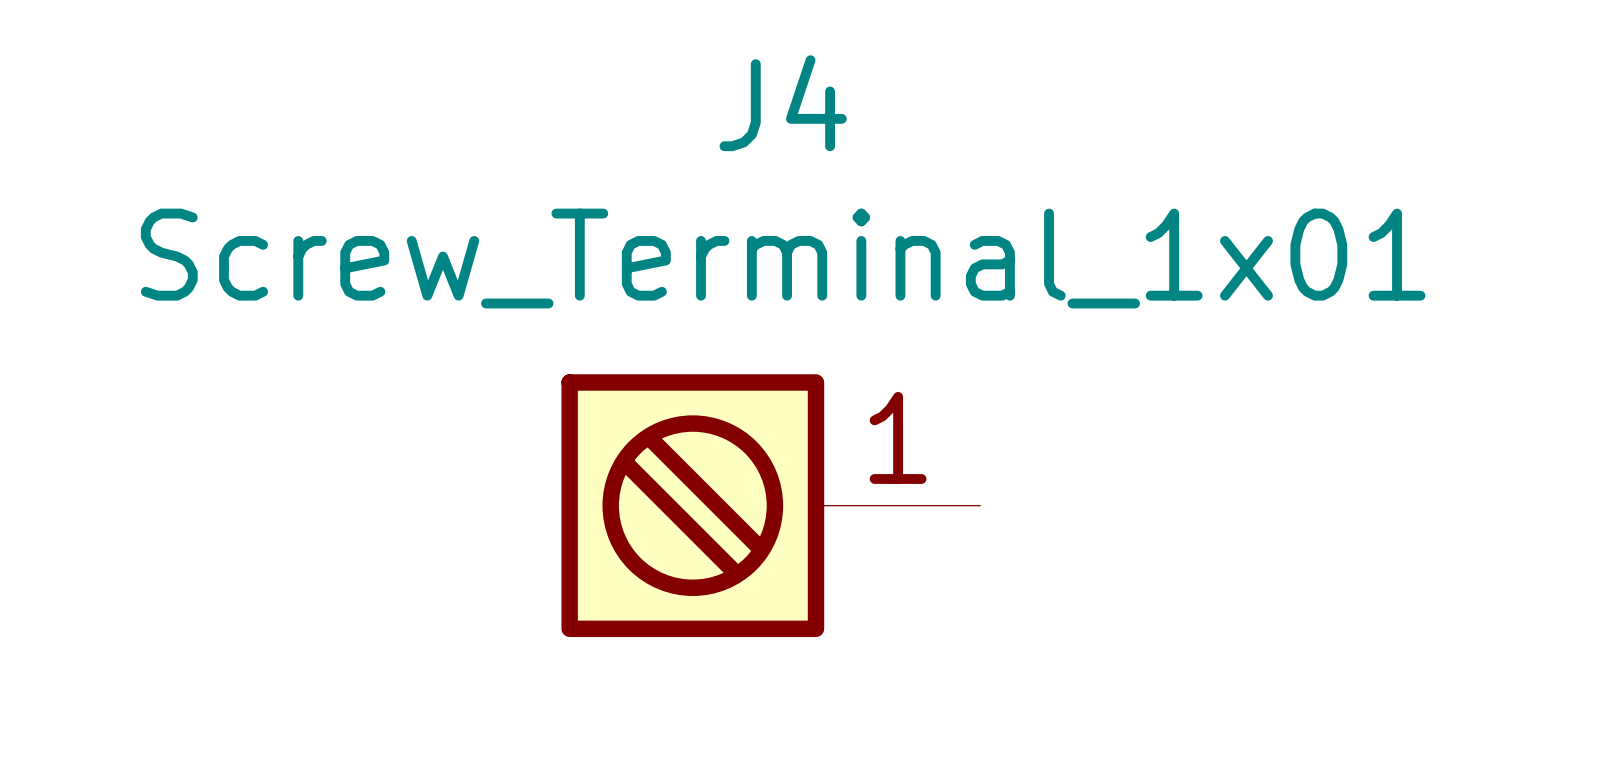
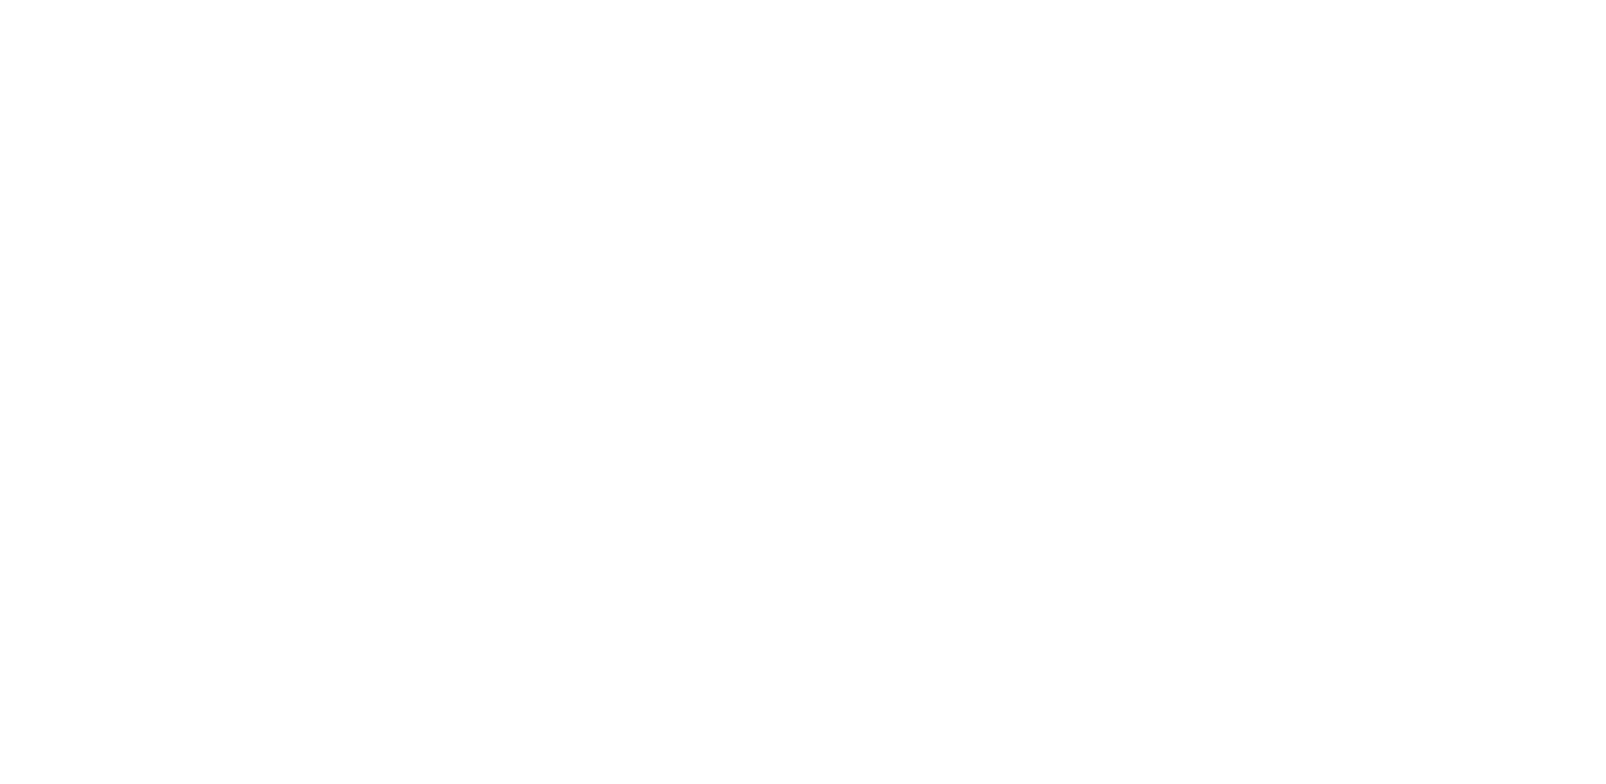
J4: Screw_Terminal_1x01 (770, 505) -> none

